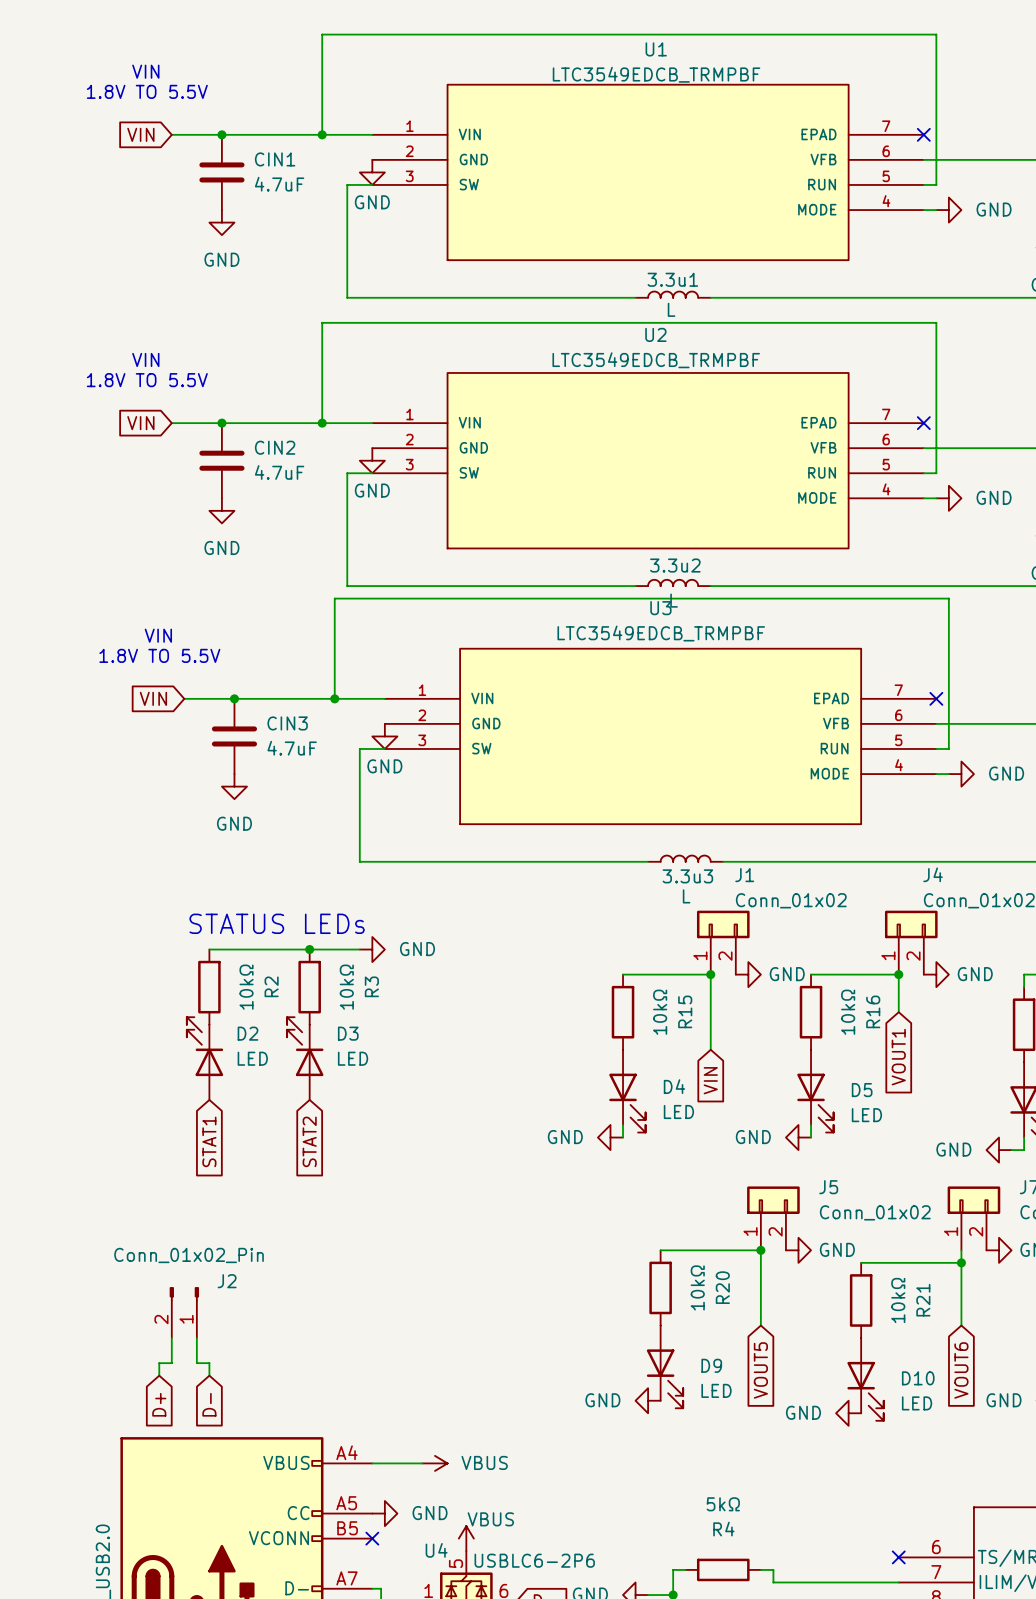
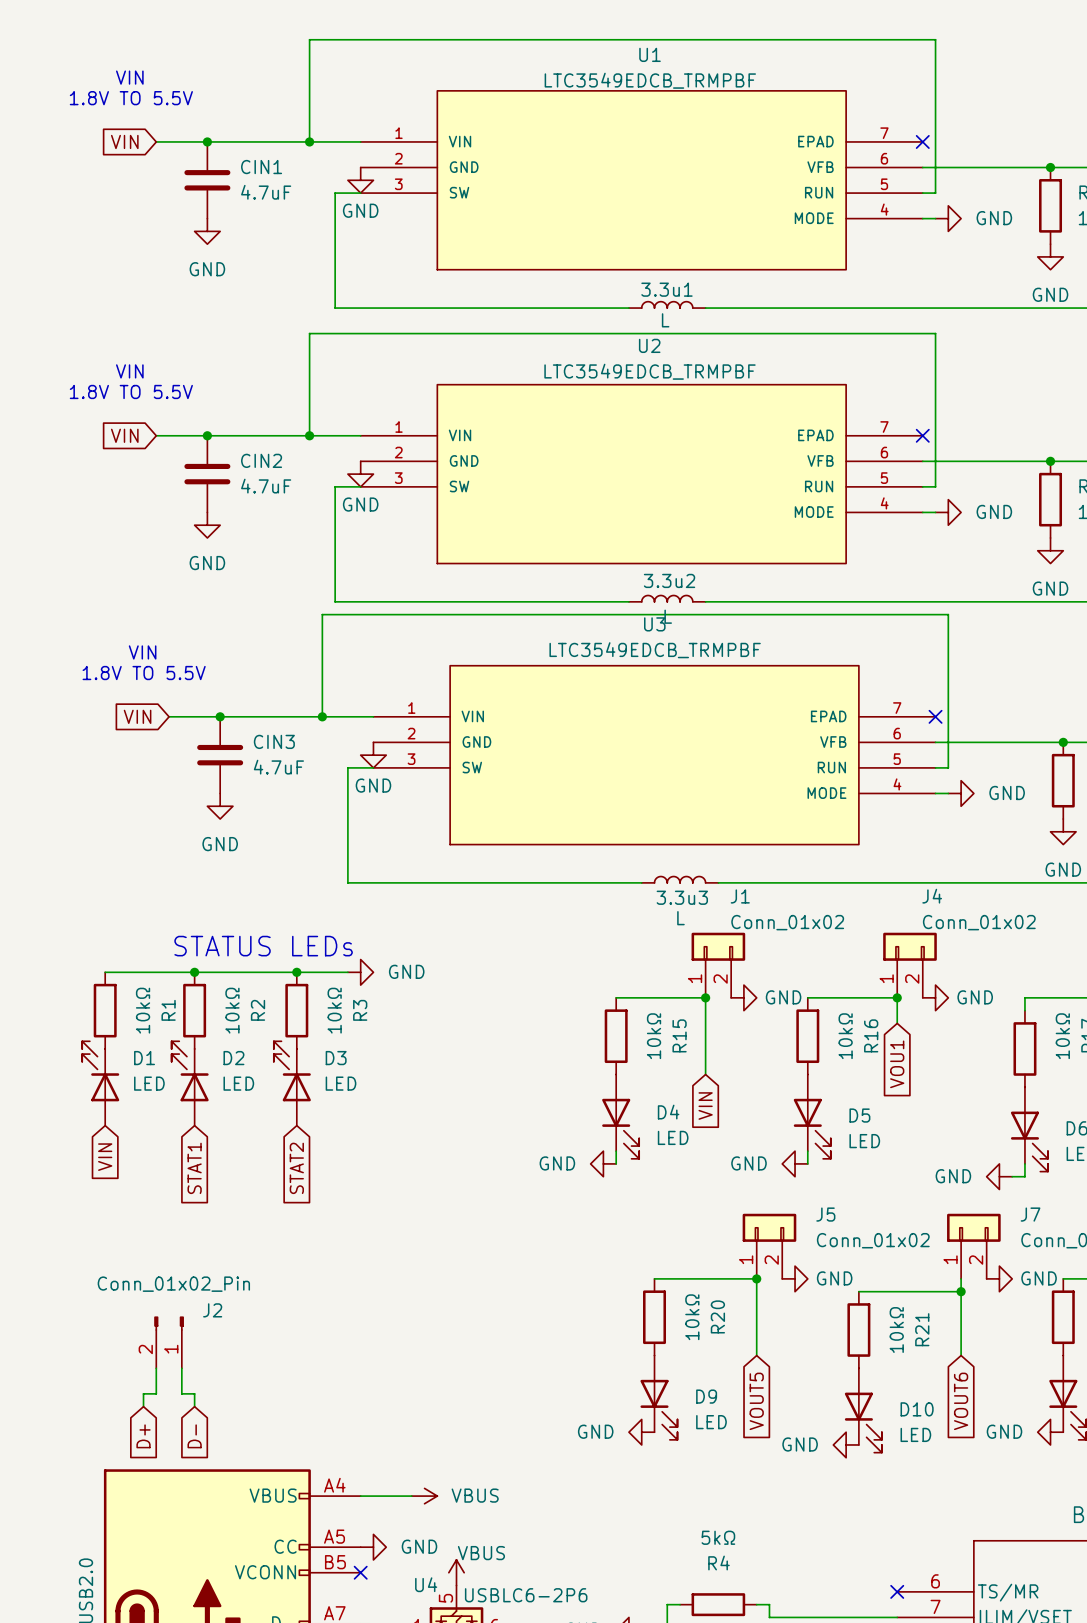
wire: none -> (105, 972) (194, 972)
junction: none -> (194, 972)
R1: none -> 10kΩ (105, 1010)
wire: (898, 999) (898, 1012) -> none
global label: VOUT1 (898, 1057) -> VOU1 (897, 1064)
D1: none -> LED (100, 1083)
global label: none -> VIN (105, 1157)

